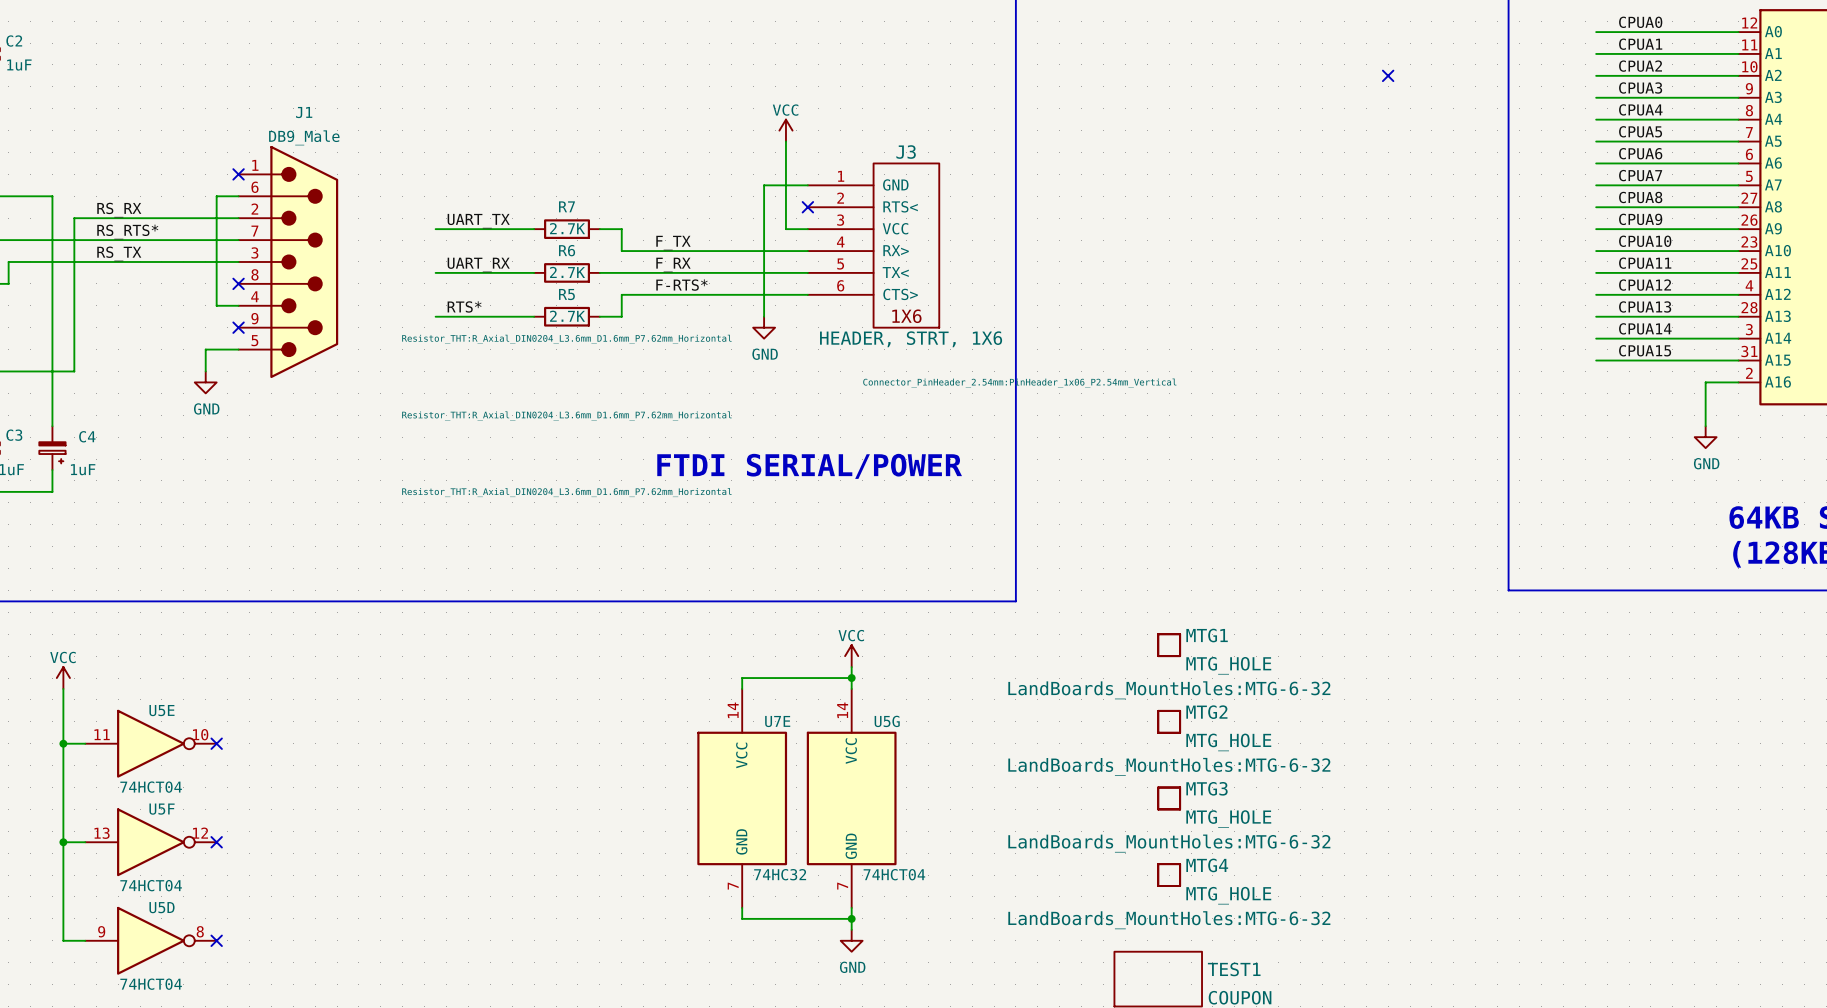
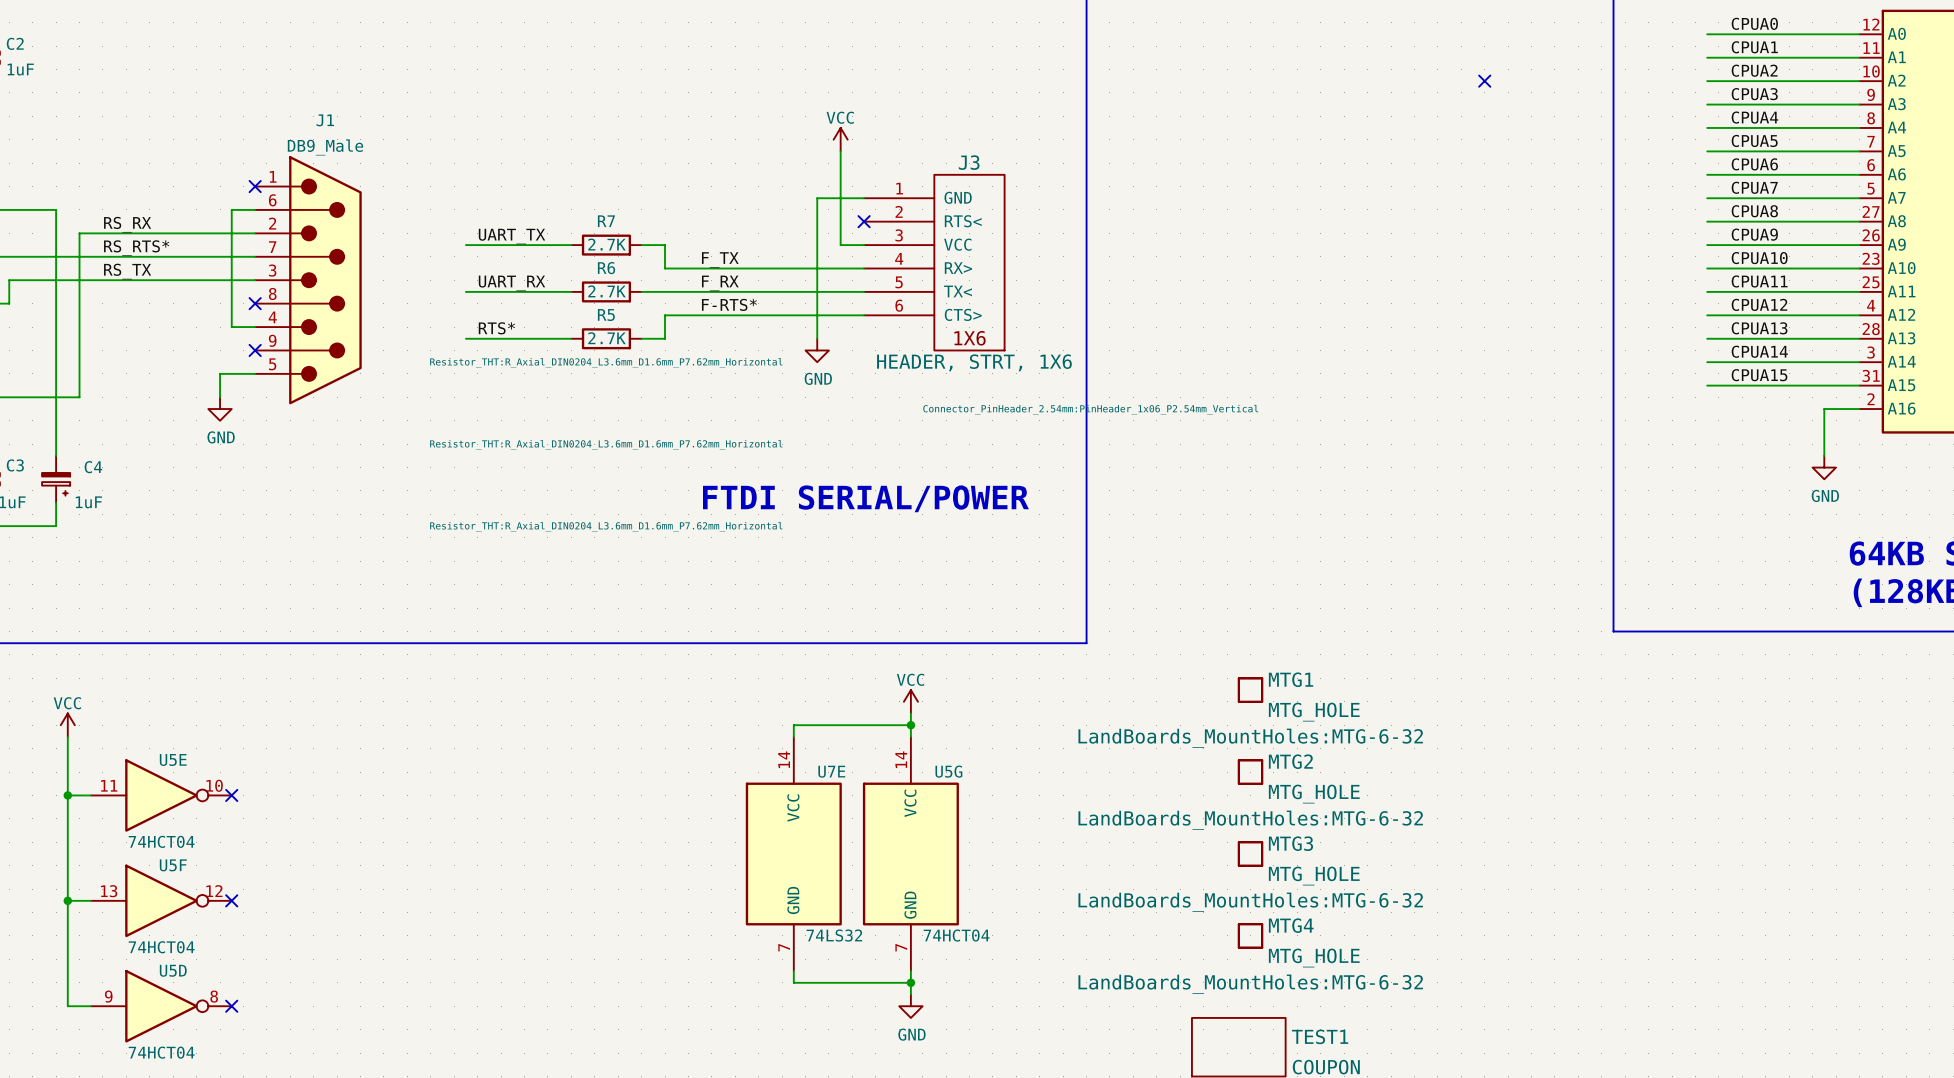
U7E value: 74HC32 (780, 874) -> 74LS32 (834, 935)

